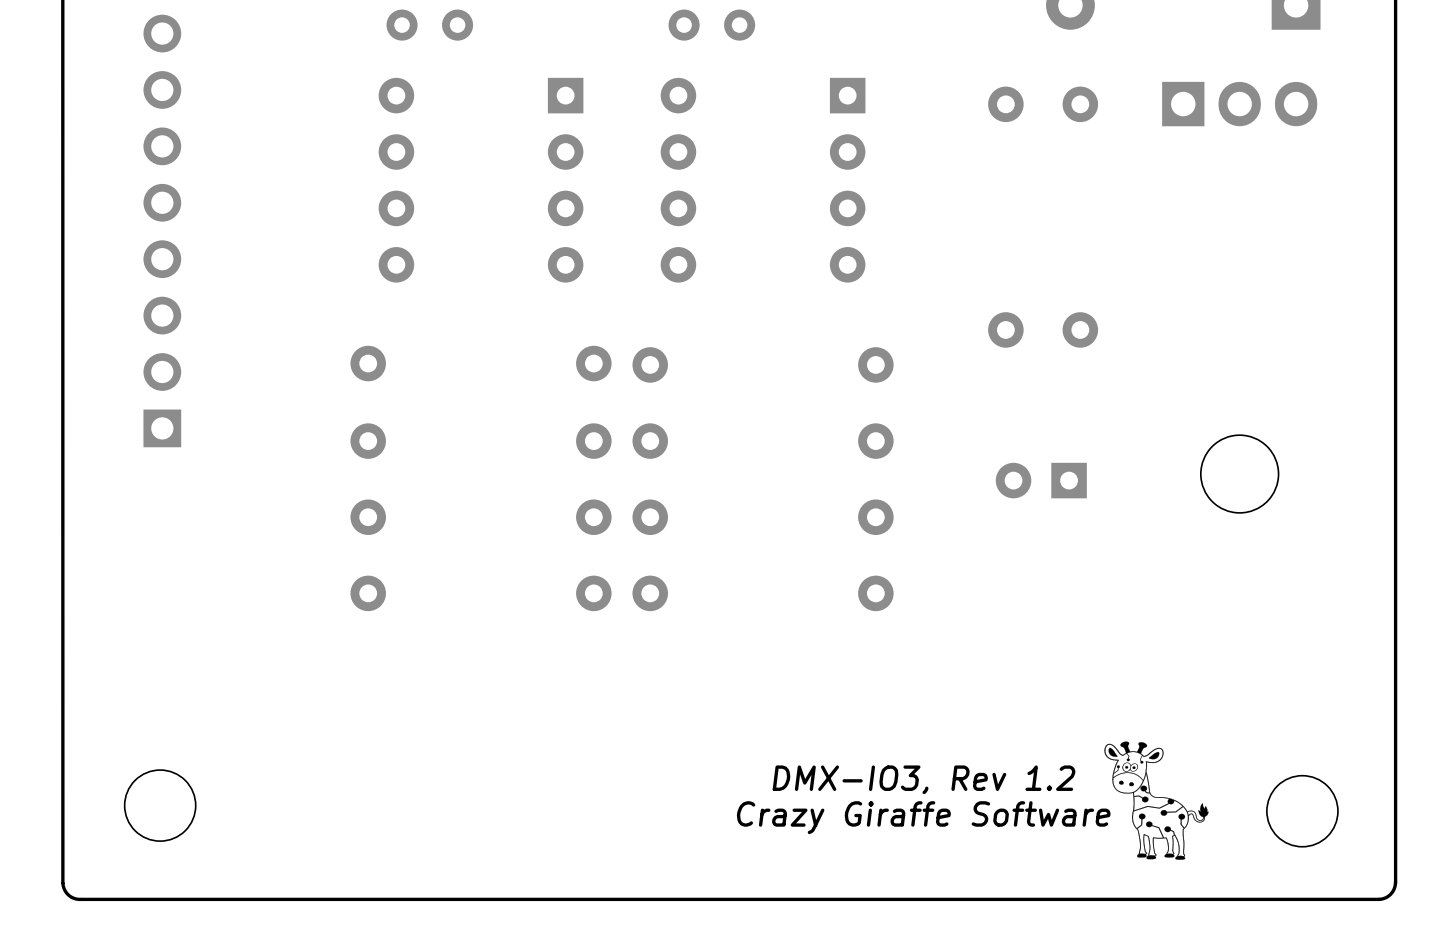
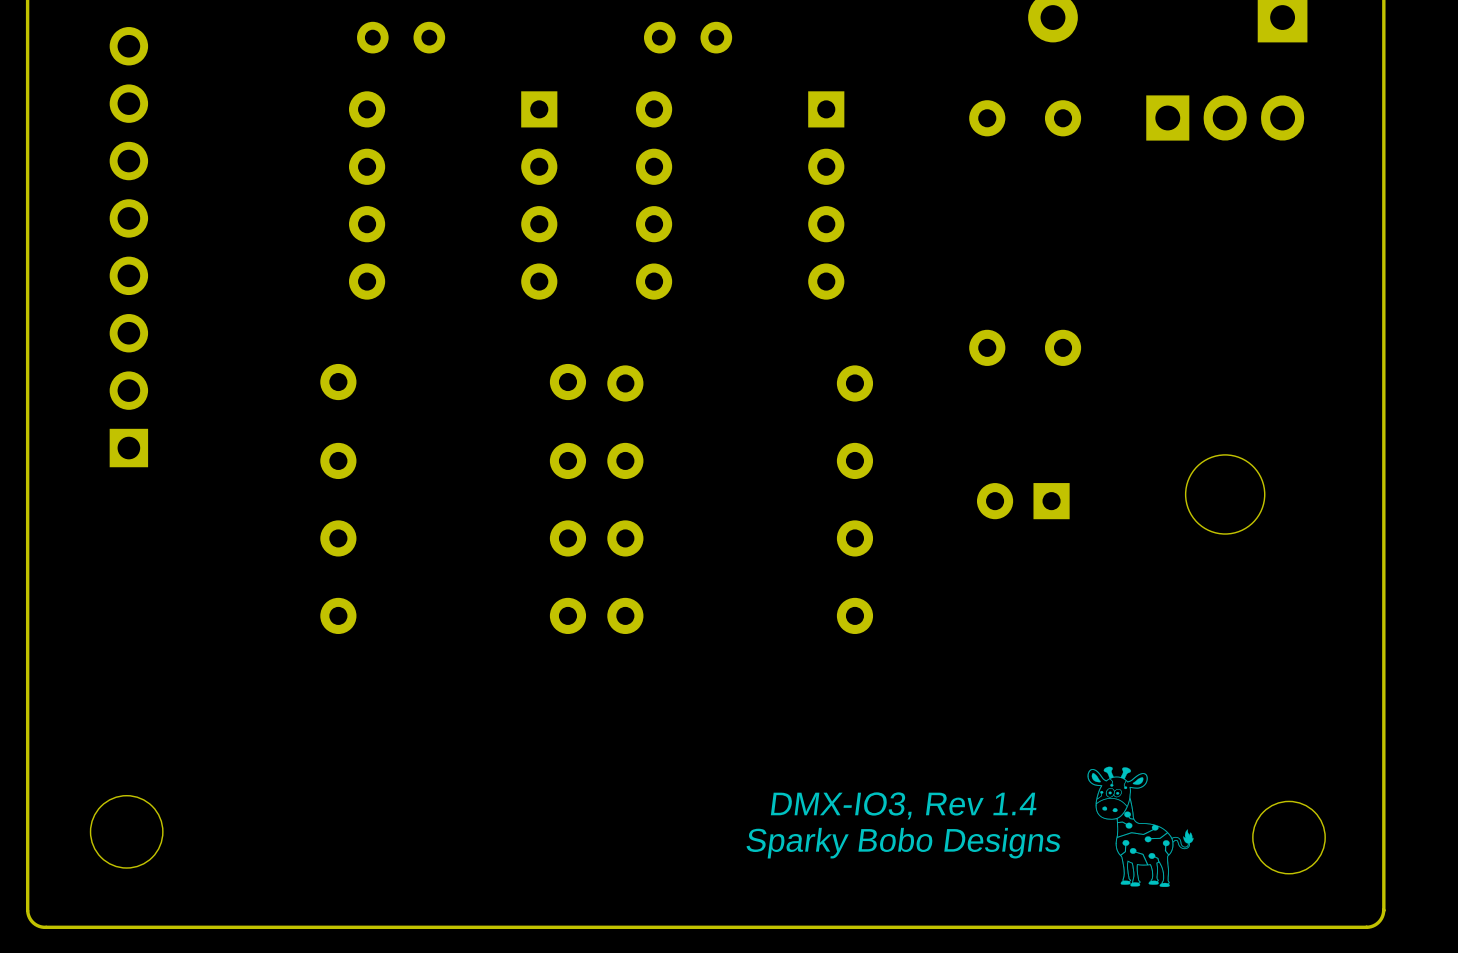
text: DMX-IO3, Rev 1.2 (924, 779) -> DMX-IO3, Rev 1.4 (903, 805)
text: Crazy Giraffe Software (923, 817) -> Sparky Bobo Designs (903, 843)

